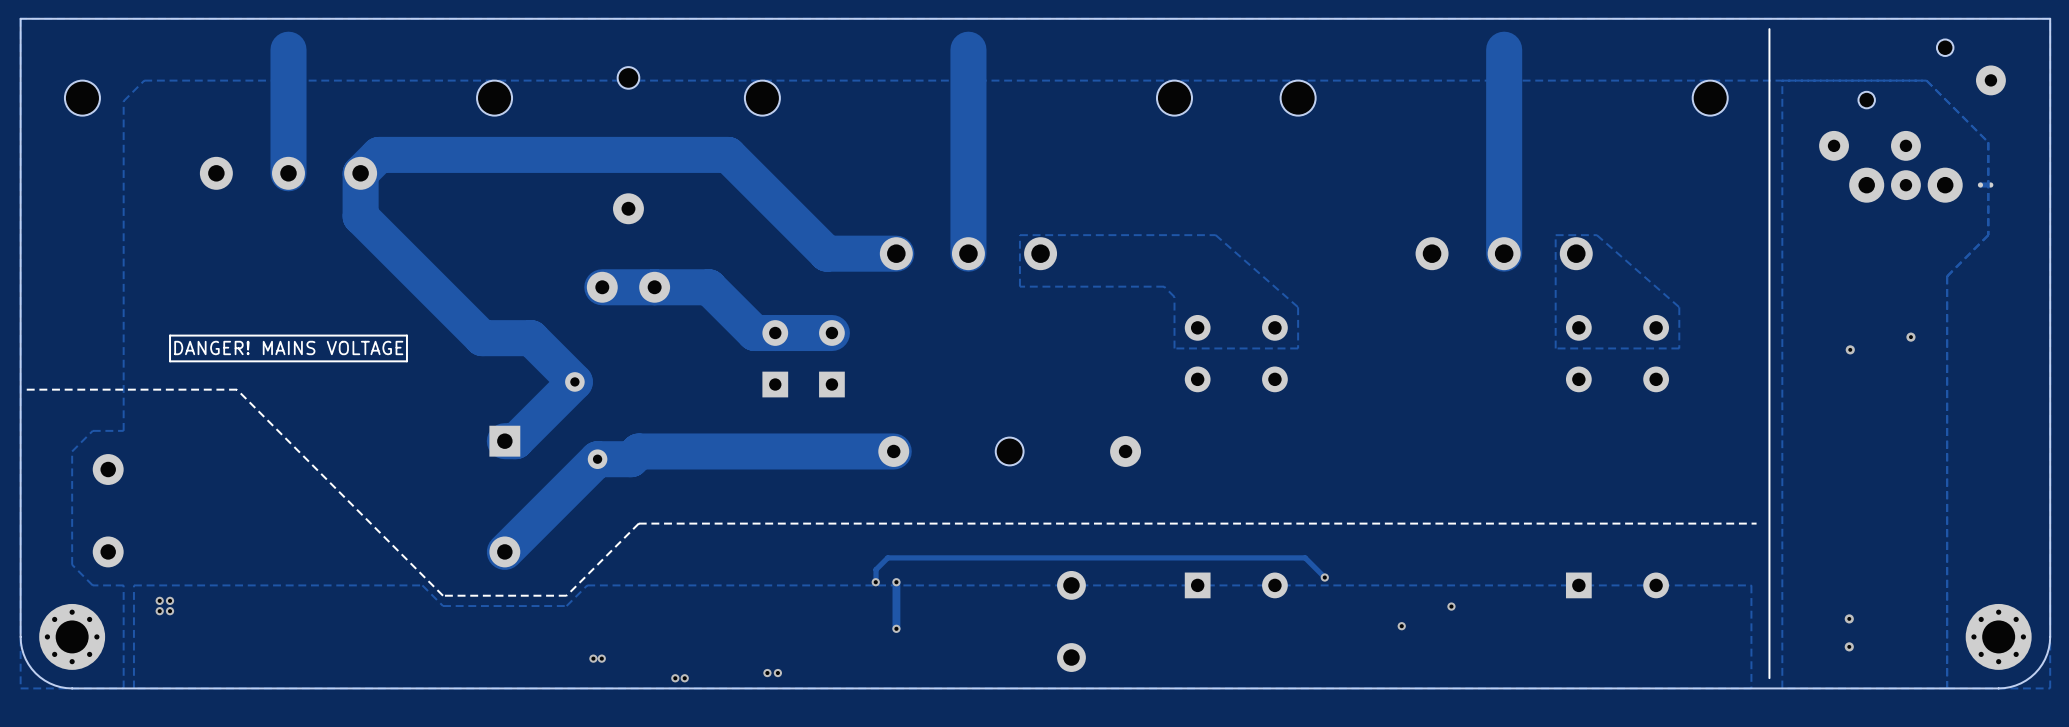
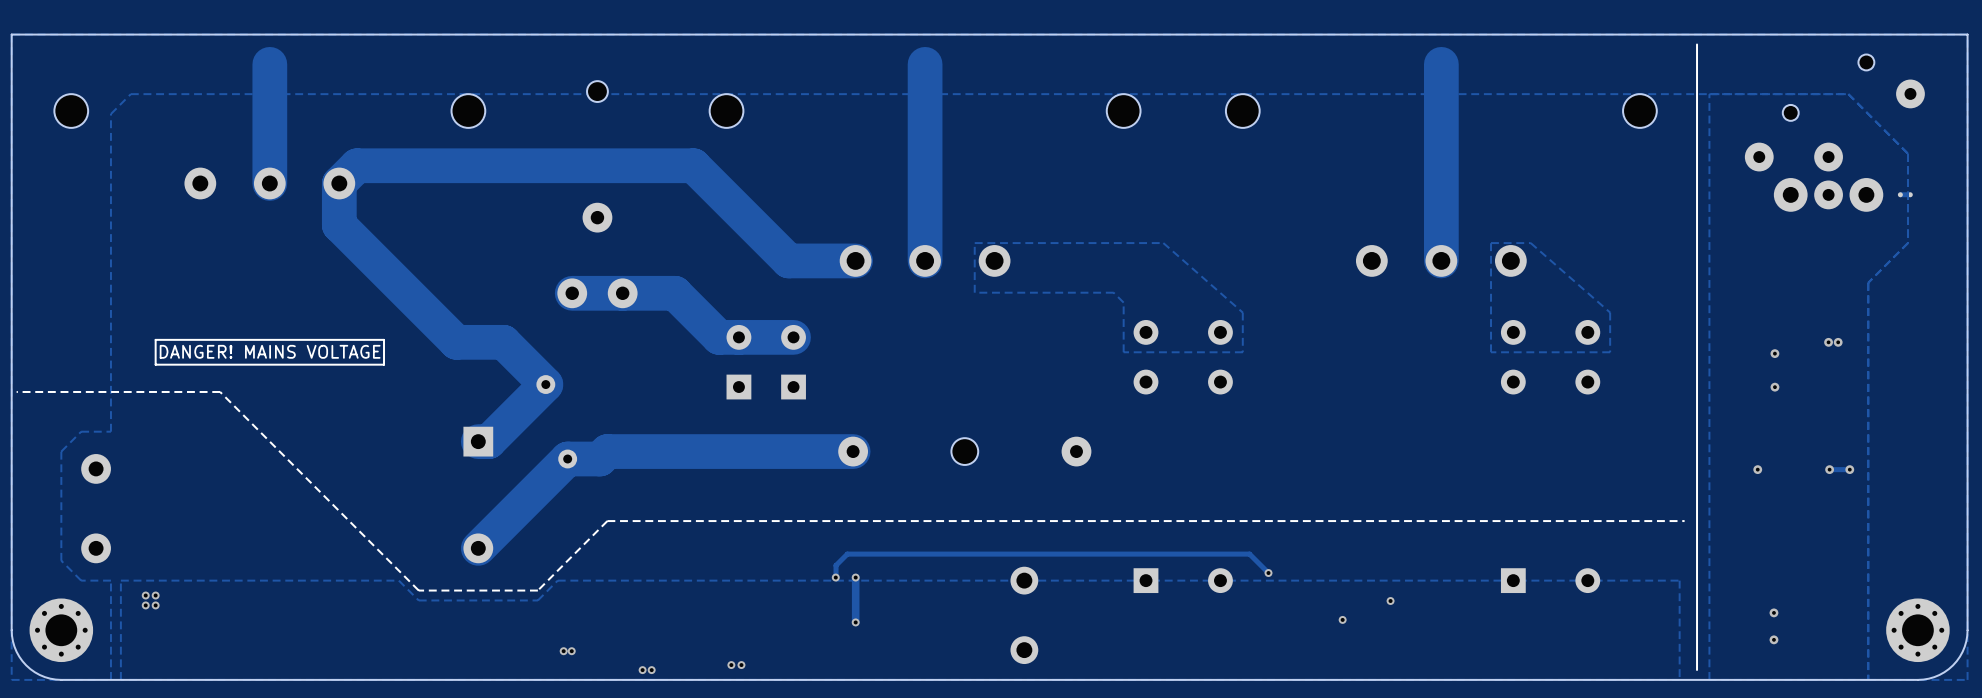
via: (1910, 337) -> none
via: none -> (1828, 342)
via: none -> (1838, 342)
via: none -> (1774, 387)
via: none -> (1757, 469)
via: none -> (1829, 469)
track: none -> (1849, 469) (1829, 469)
via: none -> (1849, 469)

